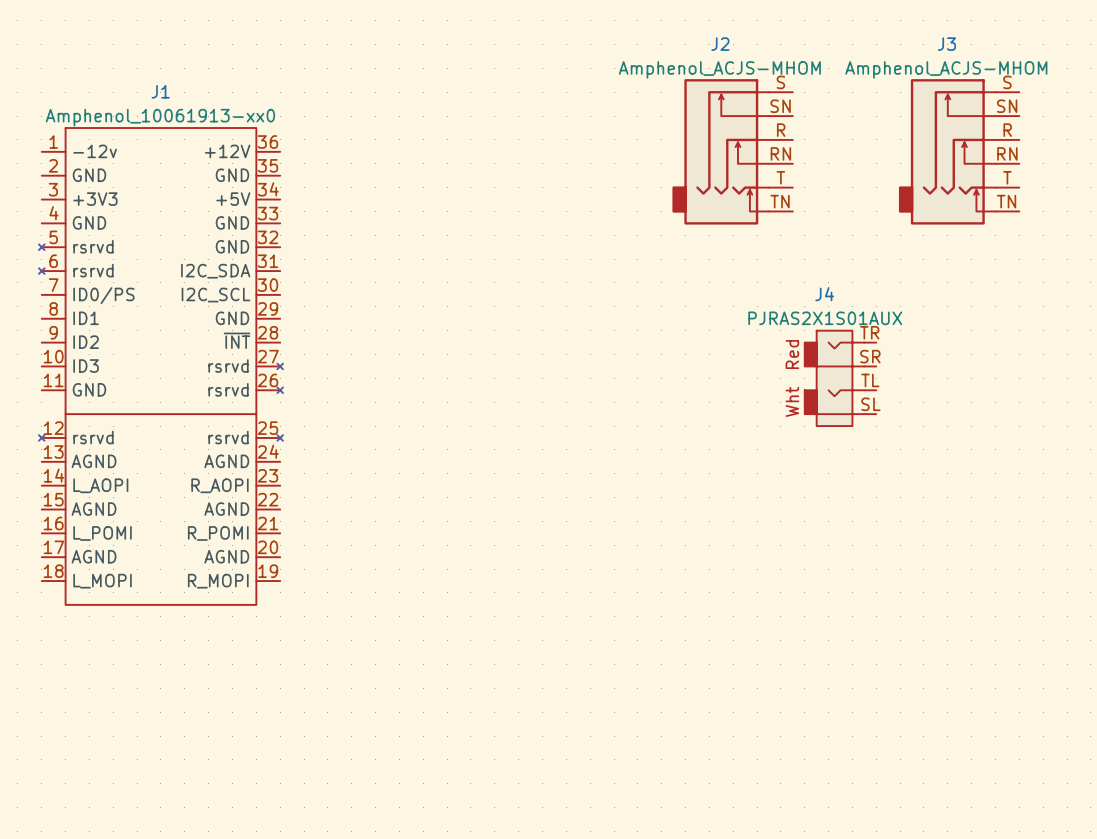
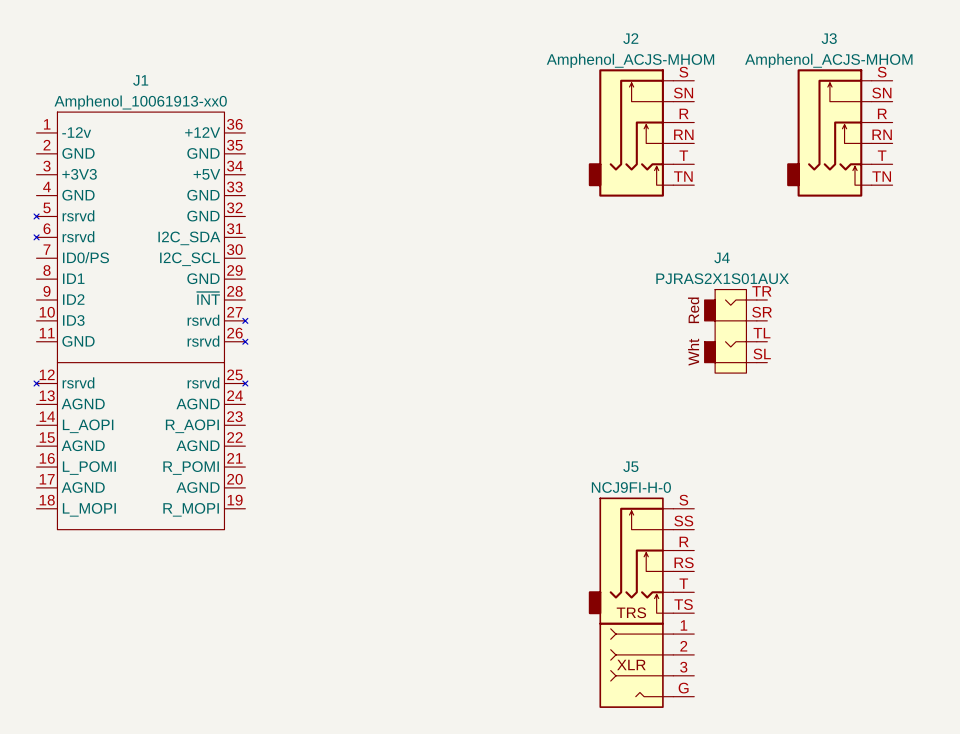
J5: none -> NCJ9FI-H-0 (641, 602)

